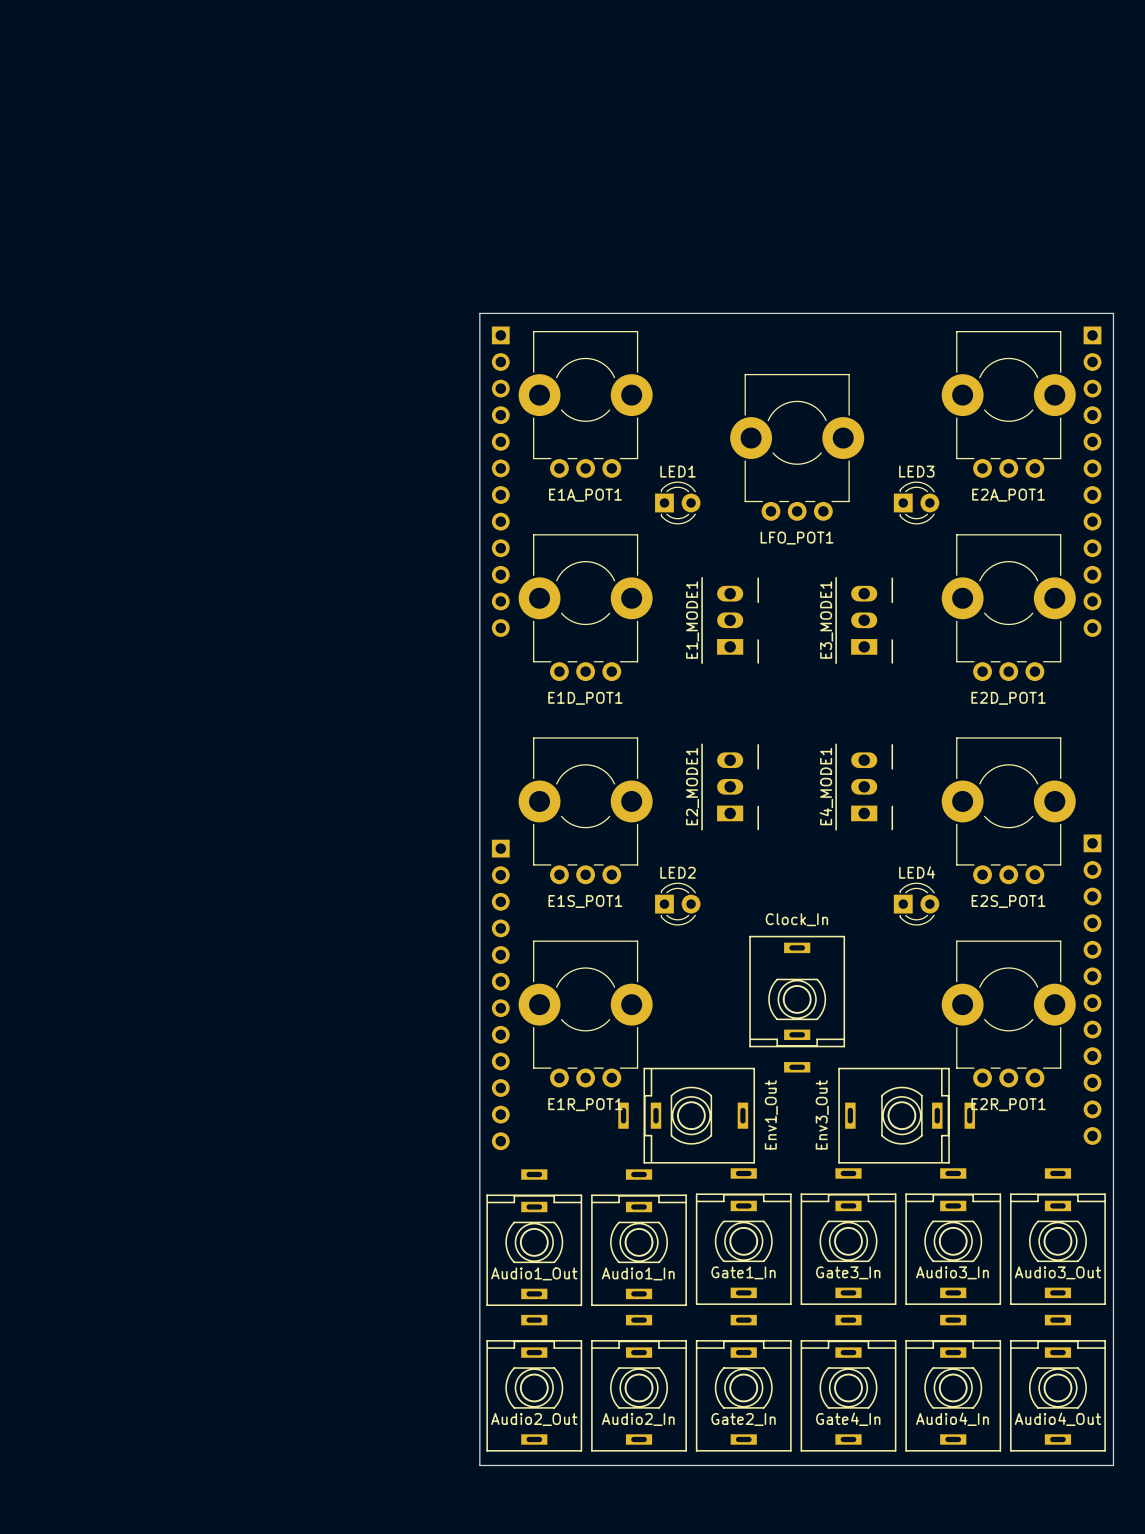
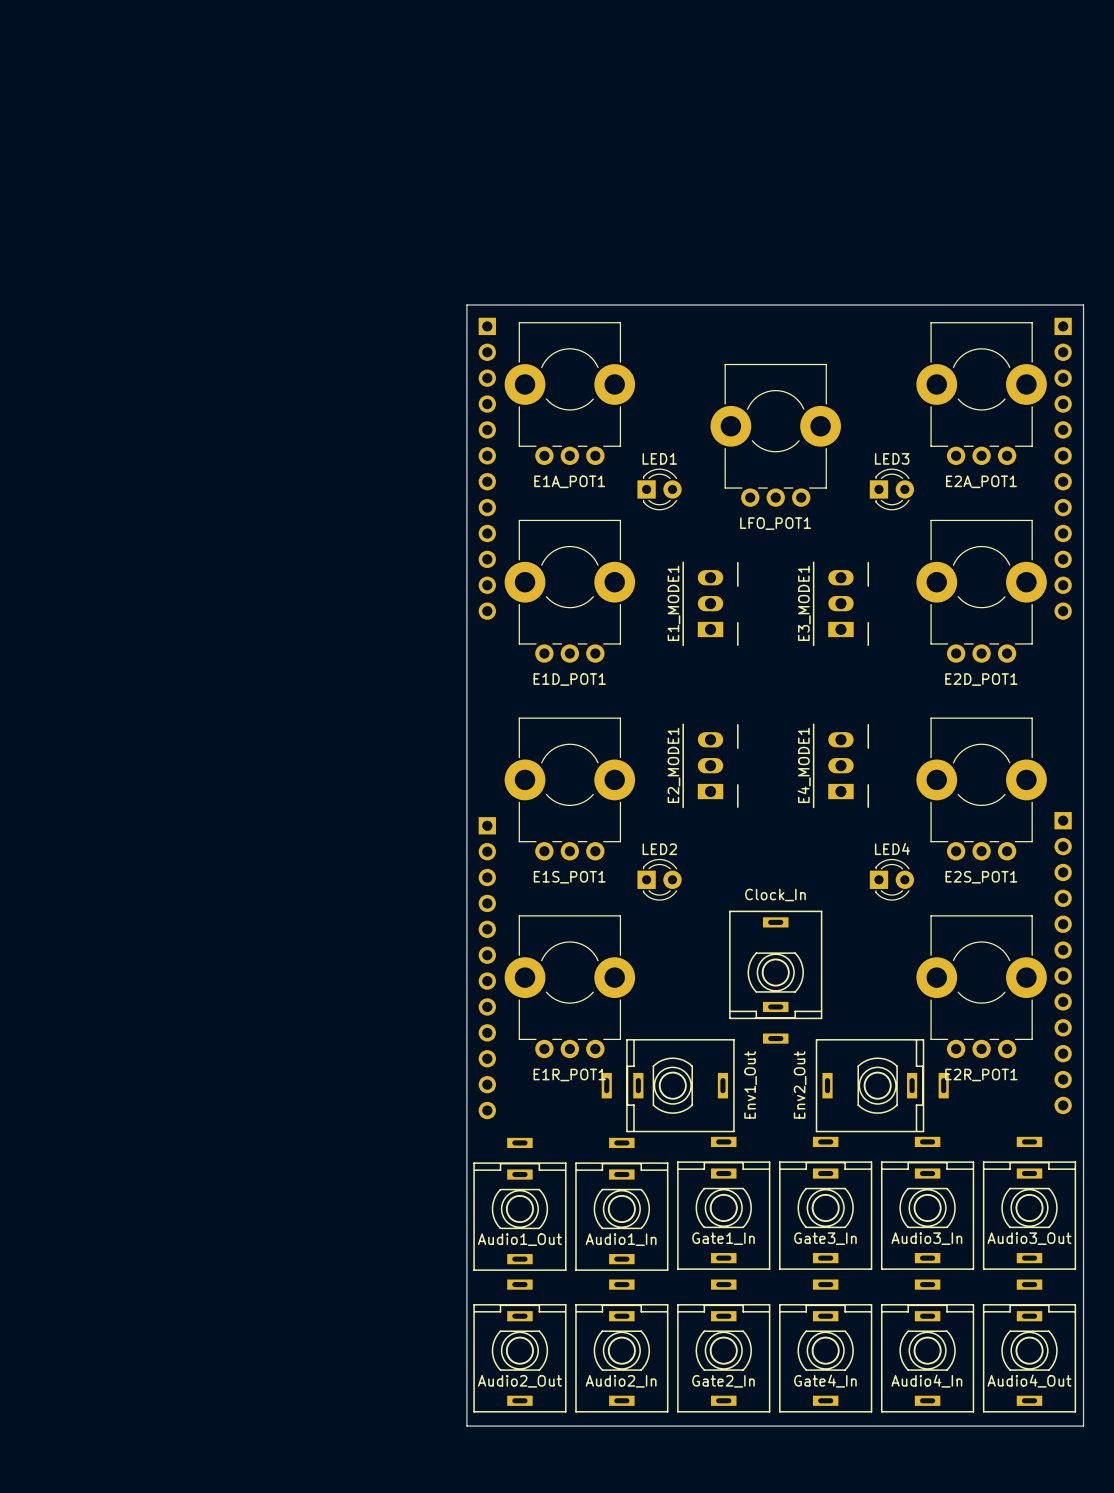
part value: Env3_Out (822, 1114) -> Env2_Out (800, 1084)

